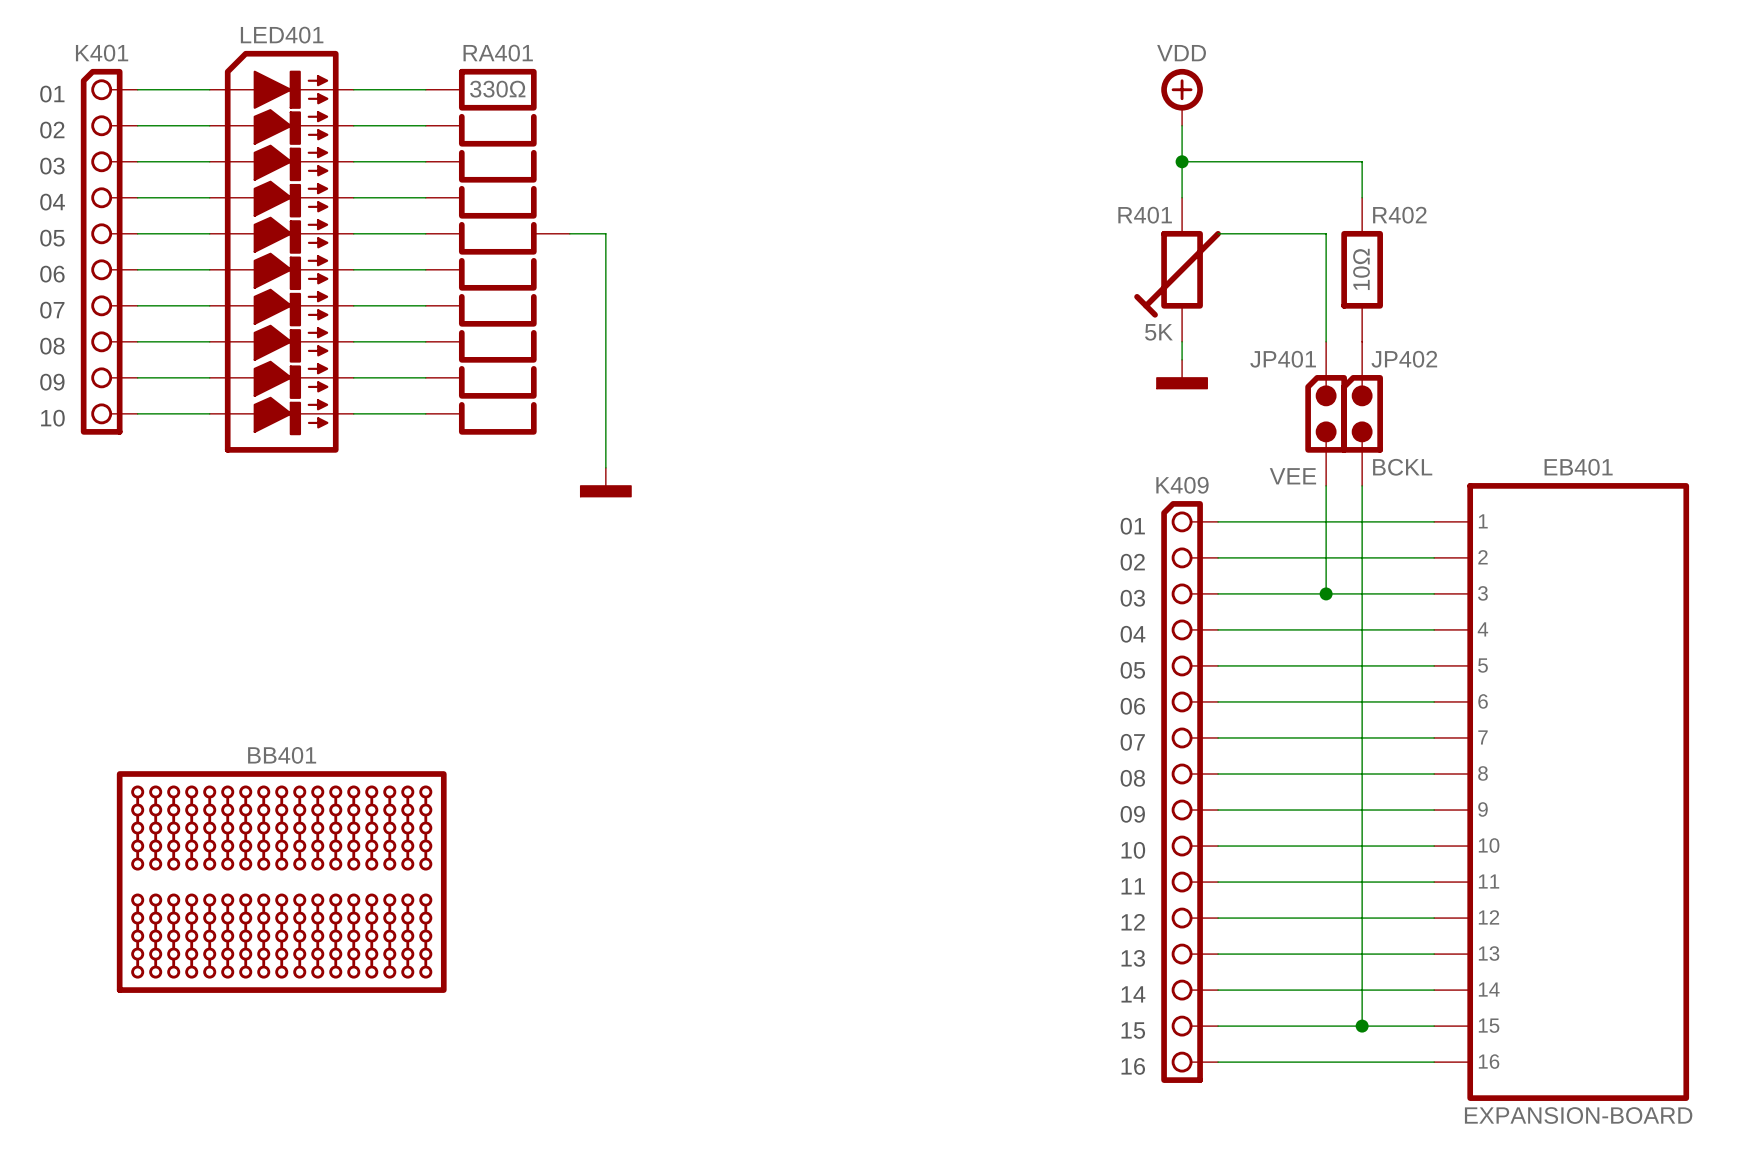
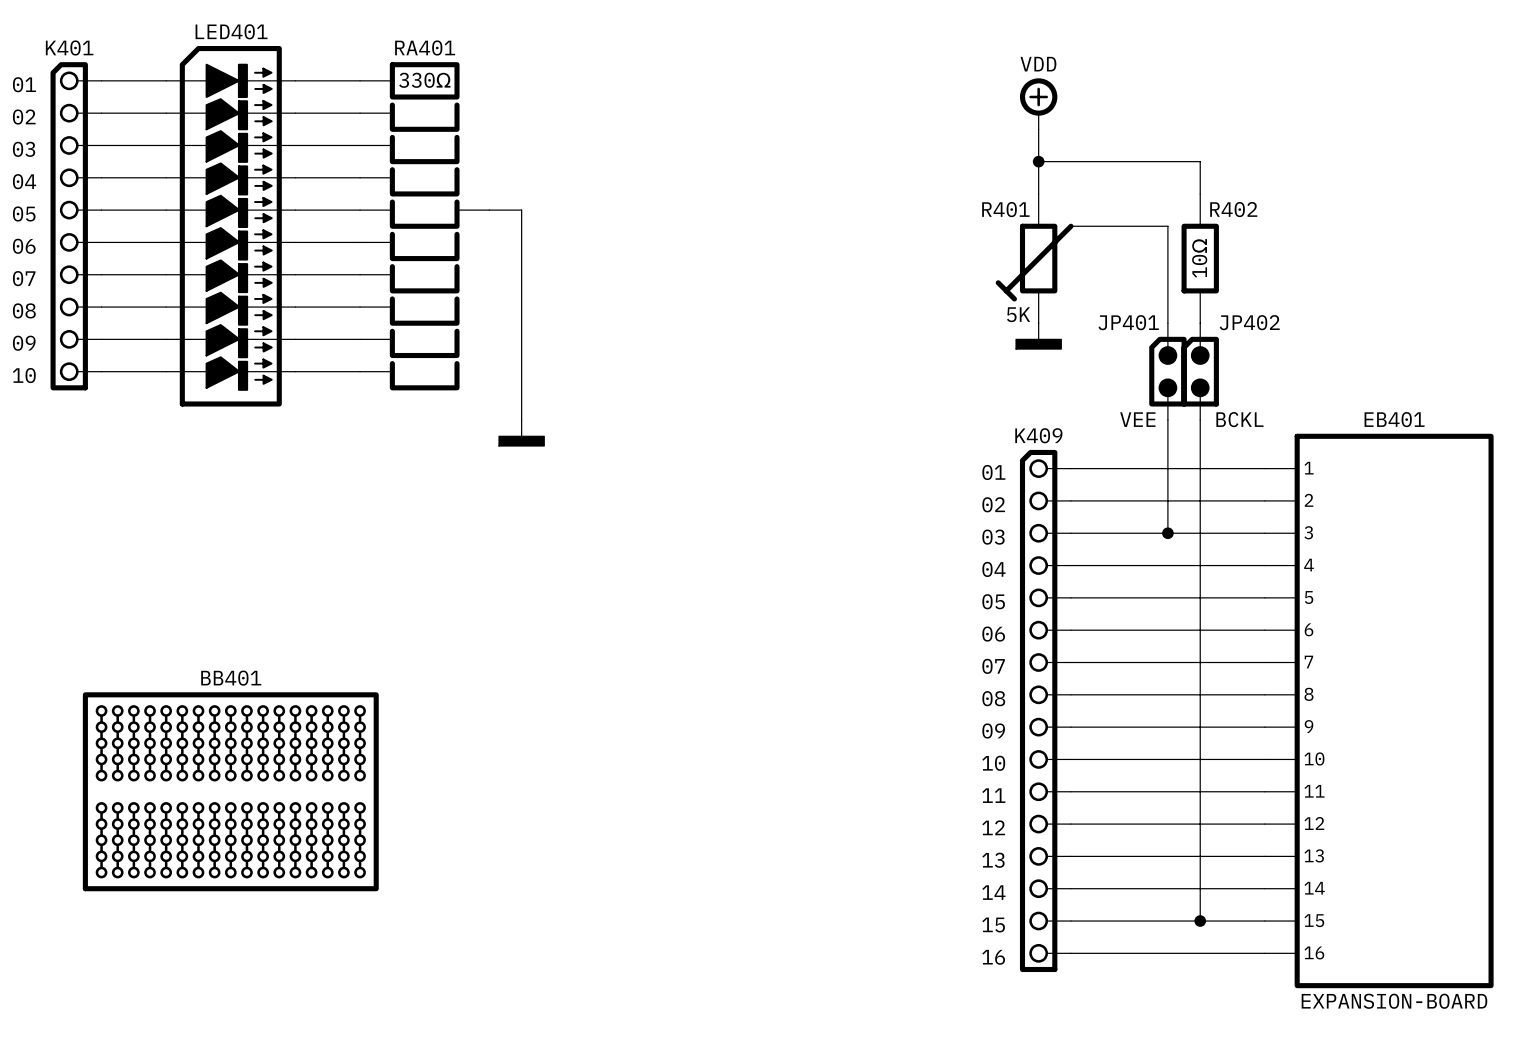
power symbol position: (1182, 97) -> (1038, 103)
wire: (1182, 161) (1362, 161) (1362, 179) -> (1038, 161) (1200, 161)
junction position: (1182, 161) -> (1038, 161)
wire: (1218, 233) (1326, 233) (1326, 251) -> (1070, 226) (1167, 226)
R401 position: (1177, 269) -> (1034, 258)
R402 position: (1362, 269) -> (1200, 258)
JP401 symbol: [1305, 341, 1347, 486] -> [1149, 323, 1187, 421]
JP402 symbol: [1341, 341, 1383, 486] -> [1181, 323, 1219, 421]

